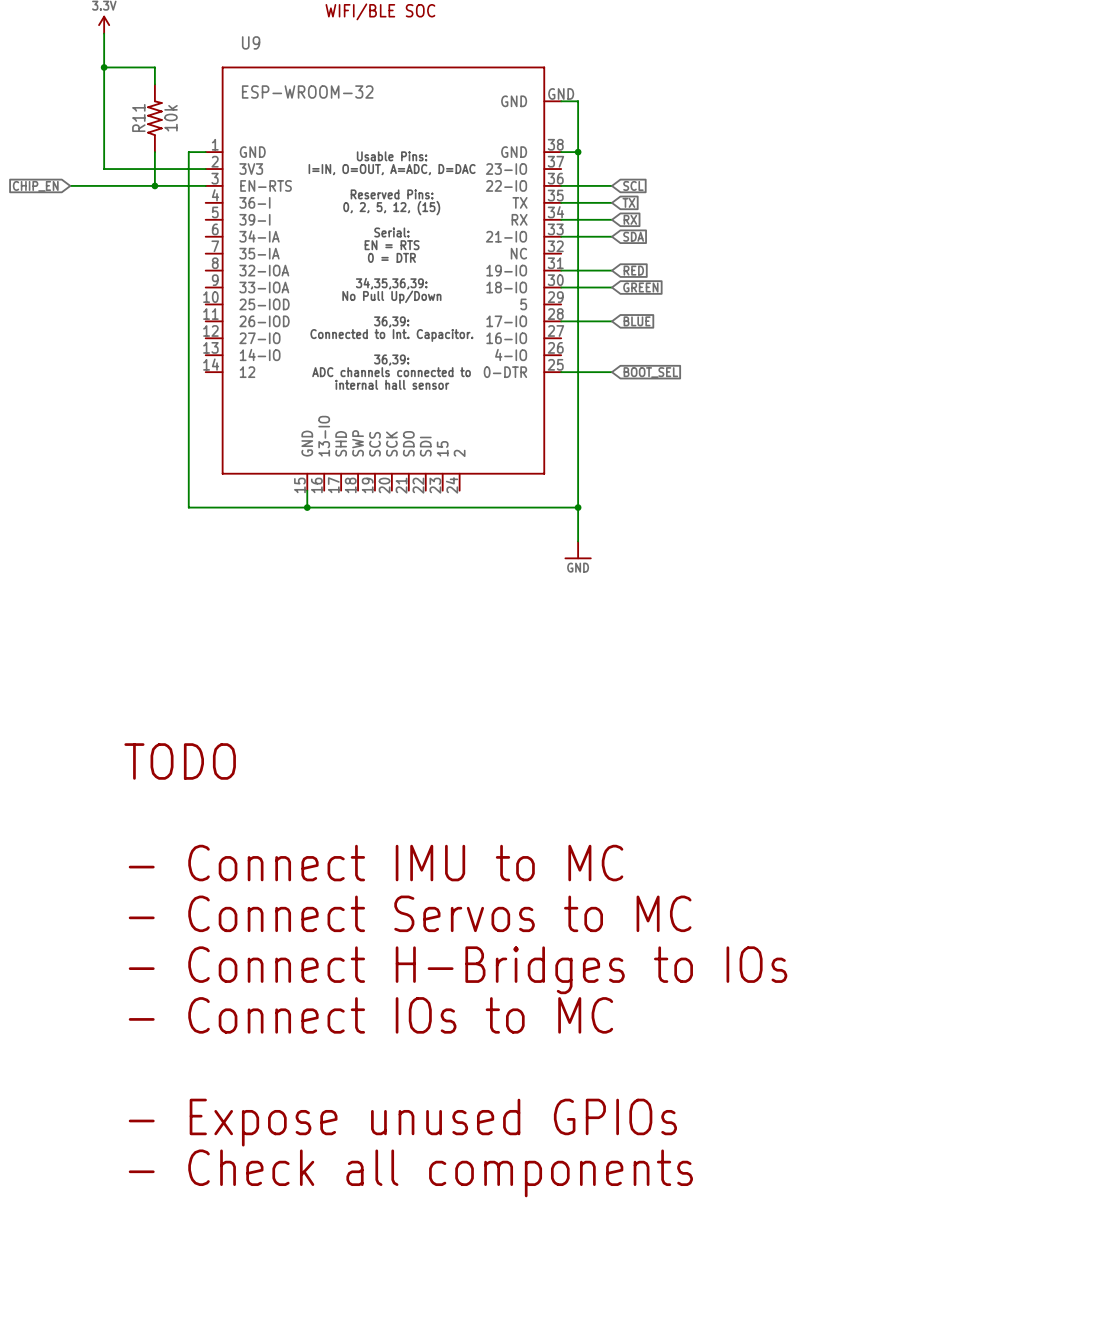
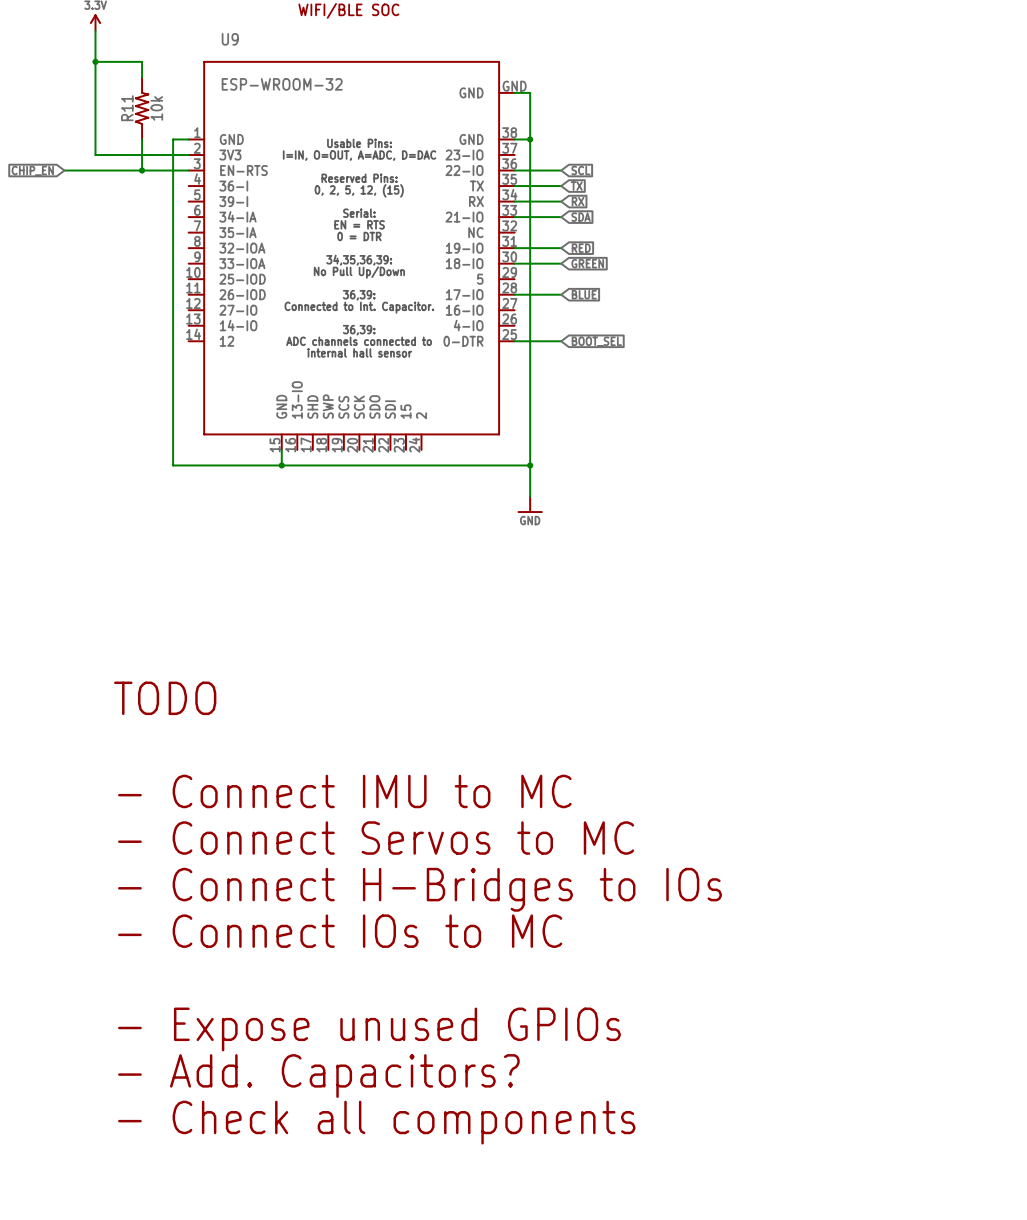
text: - Check all components (410, 1173) -> - Add. Capacitors? (318, 1076)
text: none -> - Check all components (376, 1122)

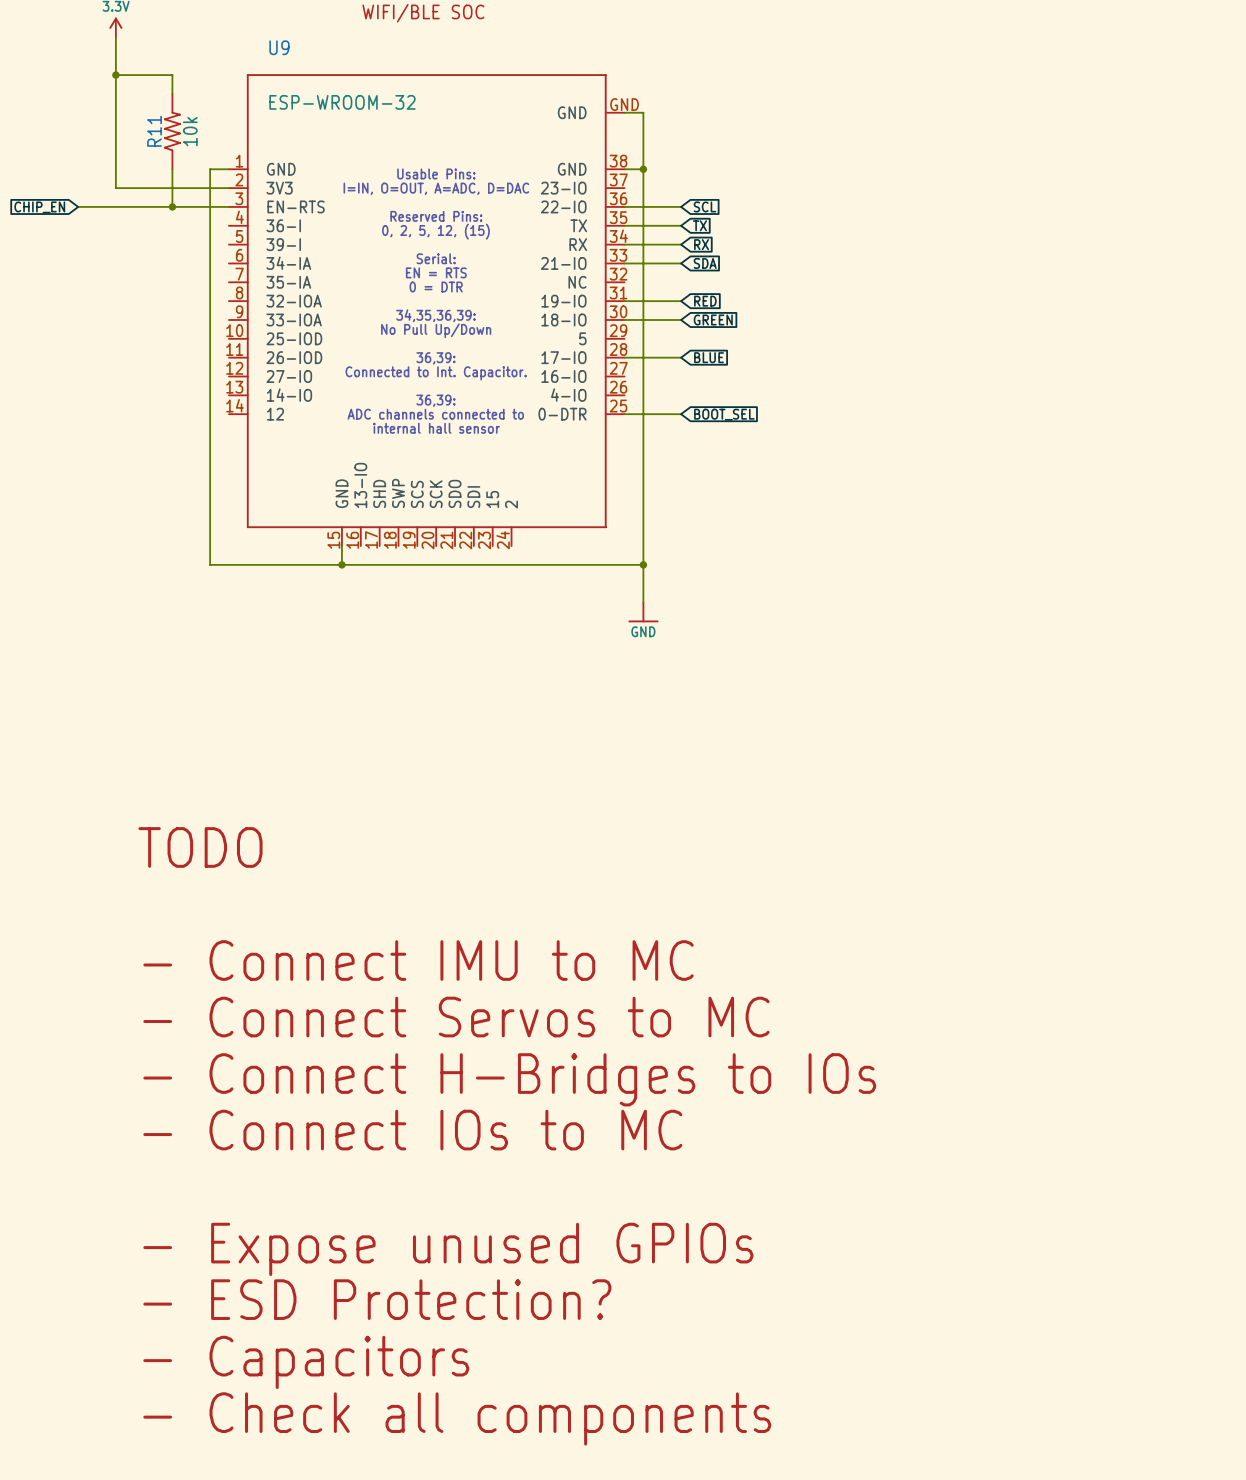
text: - Add. Capacitors? (318, 1076) -> - ESD Protection? (377, 1299)
text: - Check all components (376, 1122) -> - Capacitors (306, 1362)
text: none -> - Check all components (457, 1418)

